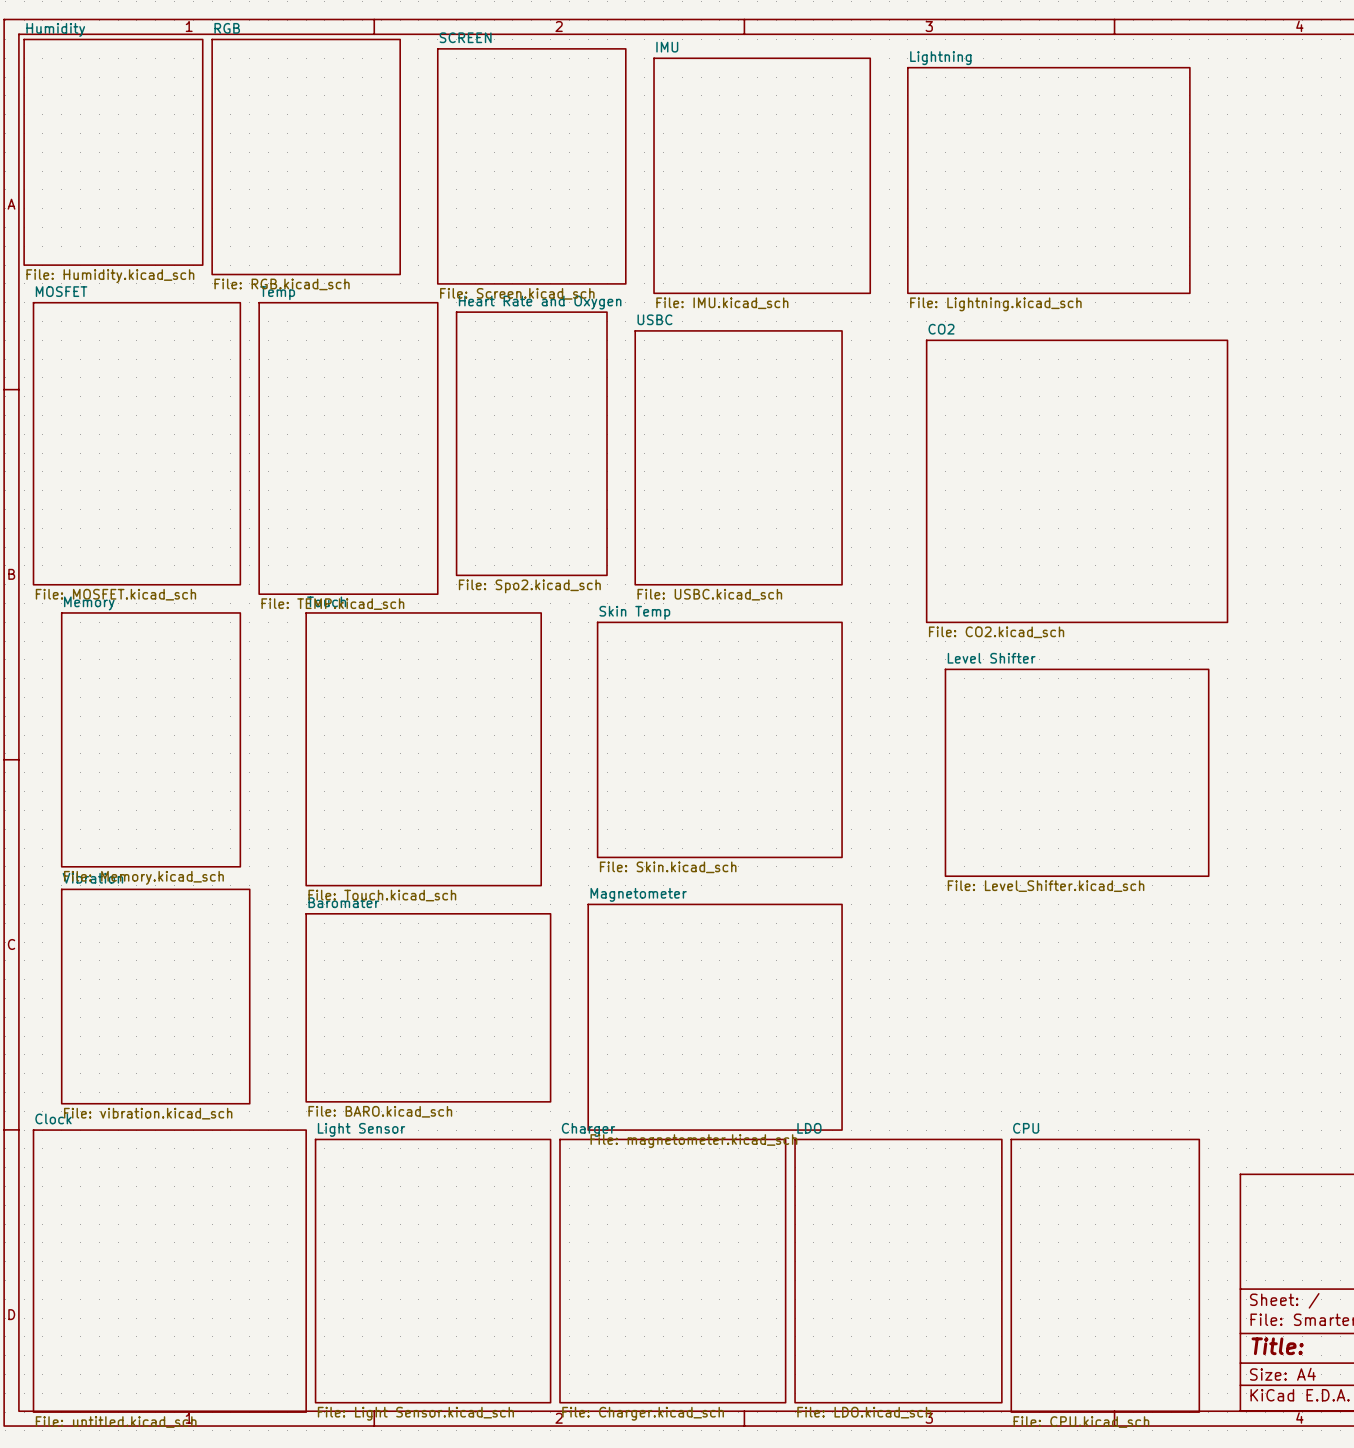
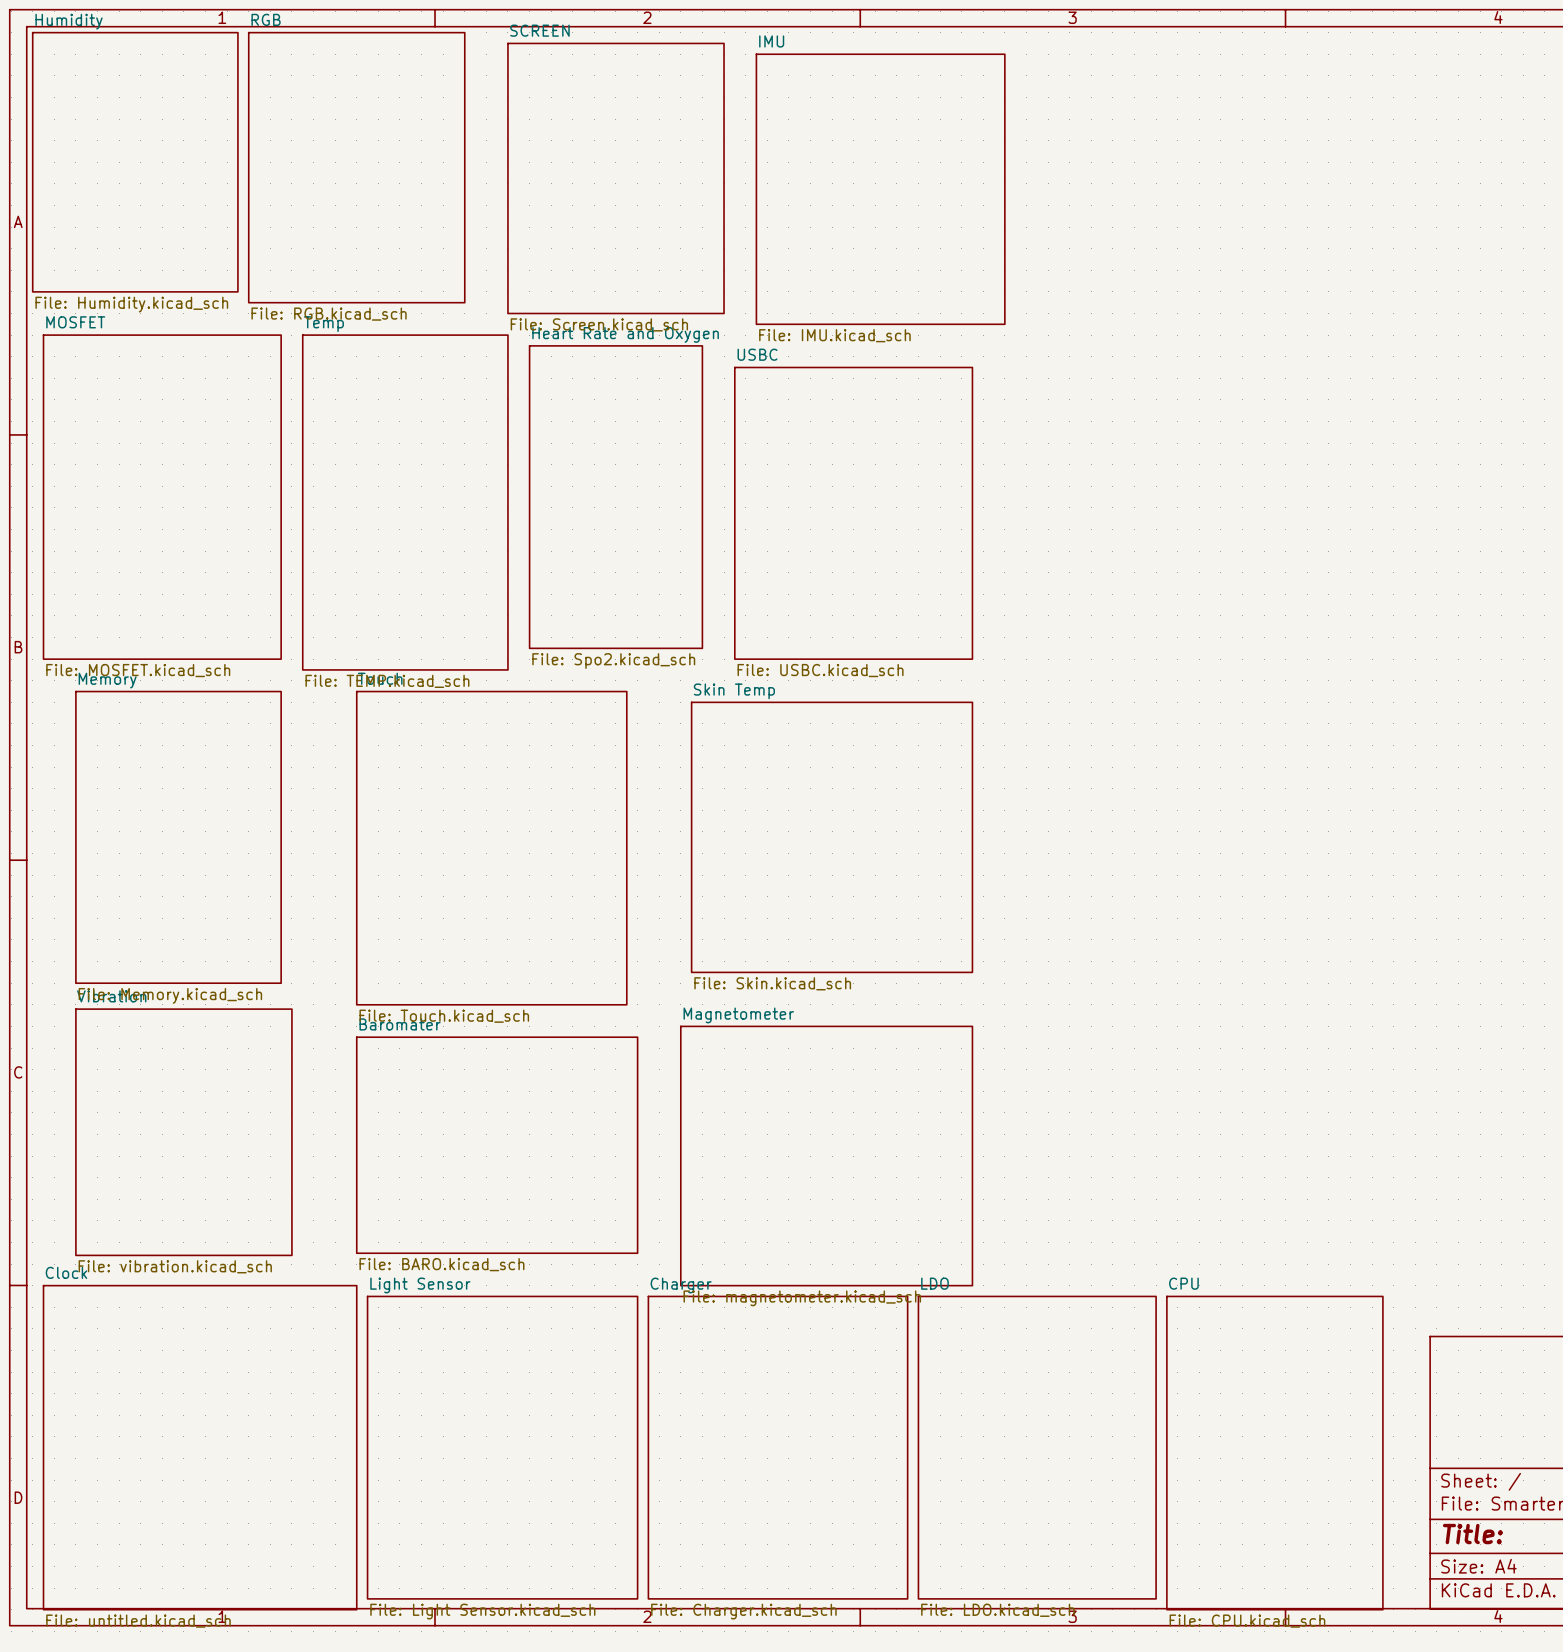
sheet Lightning: File: Lightning.kicad_sch (1048, 180) -> none
sheet CO2: File: CO2.kicad_sch (1077, 481) -> none
sheet Level Shifter: File: Level_Shifter.kicad_sch (1077, 772) -> none

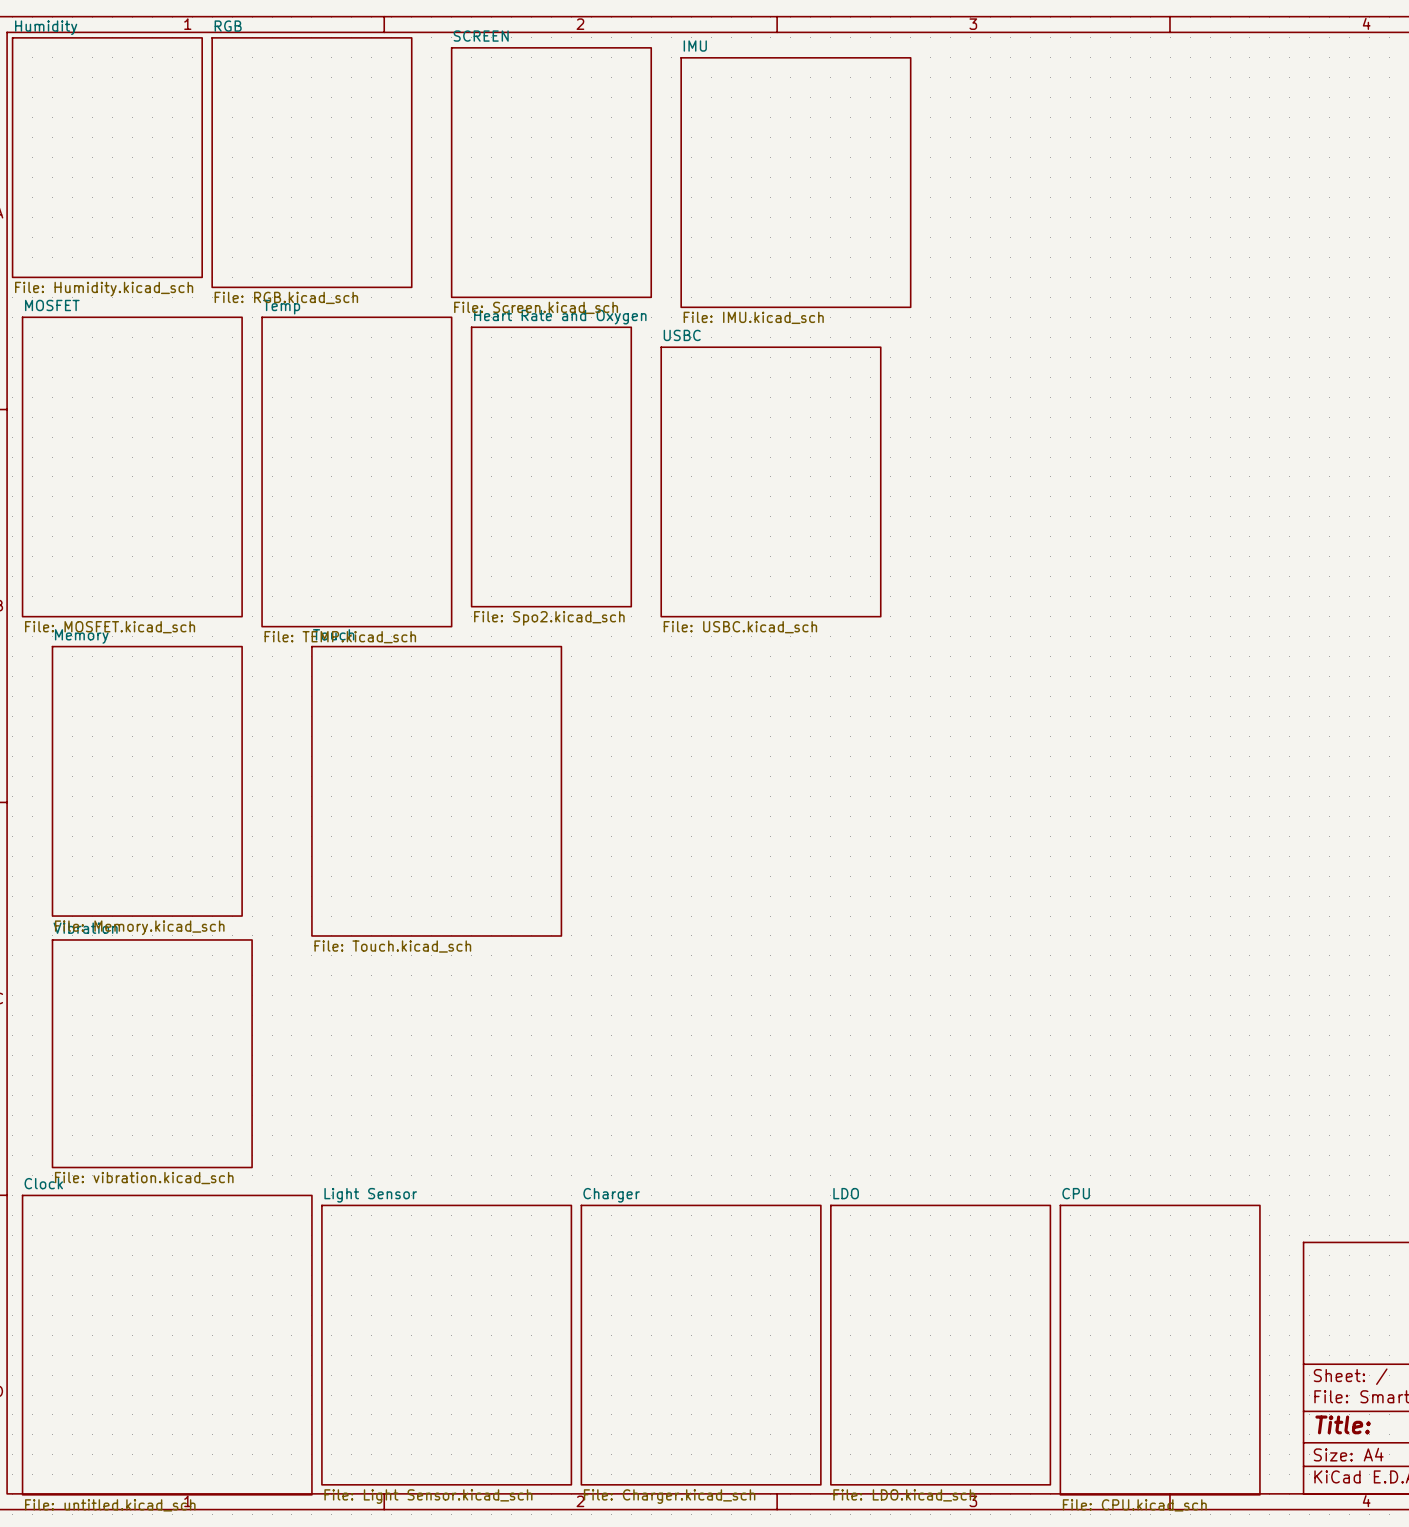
sheet Skin Temp: File: Skin.kicad_sch (832, 837) -> none
sheet Baromater: File: BARO.kicad_sch (497, 1145) -> none
sheet Magnetometer: File: magnetometer.kicad_sch (826, 1156) -> none

